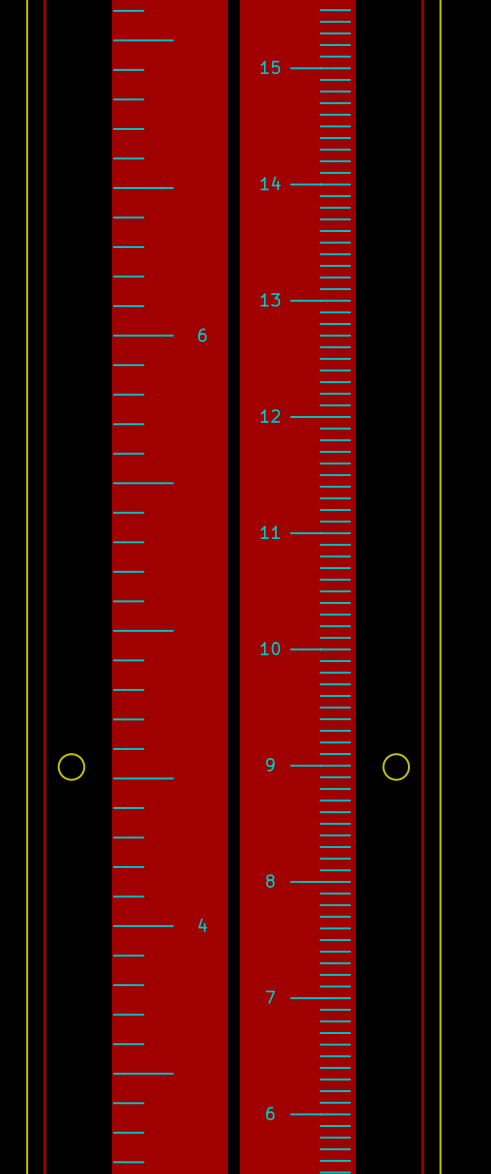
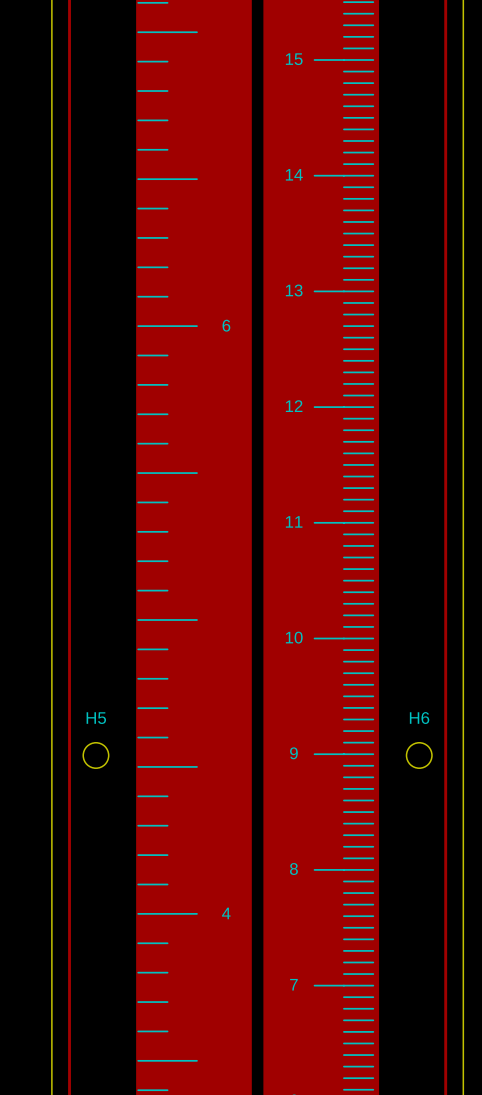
H5 name: none -> H5 (96, 718)
H6 name: none -> H6 (419, 718)

